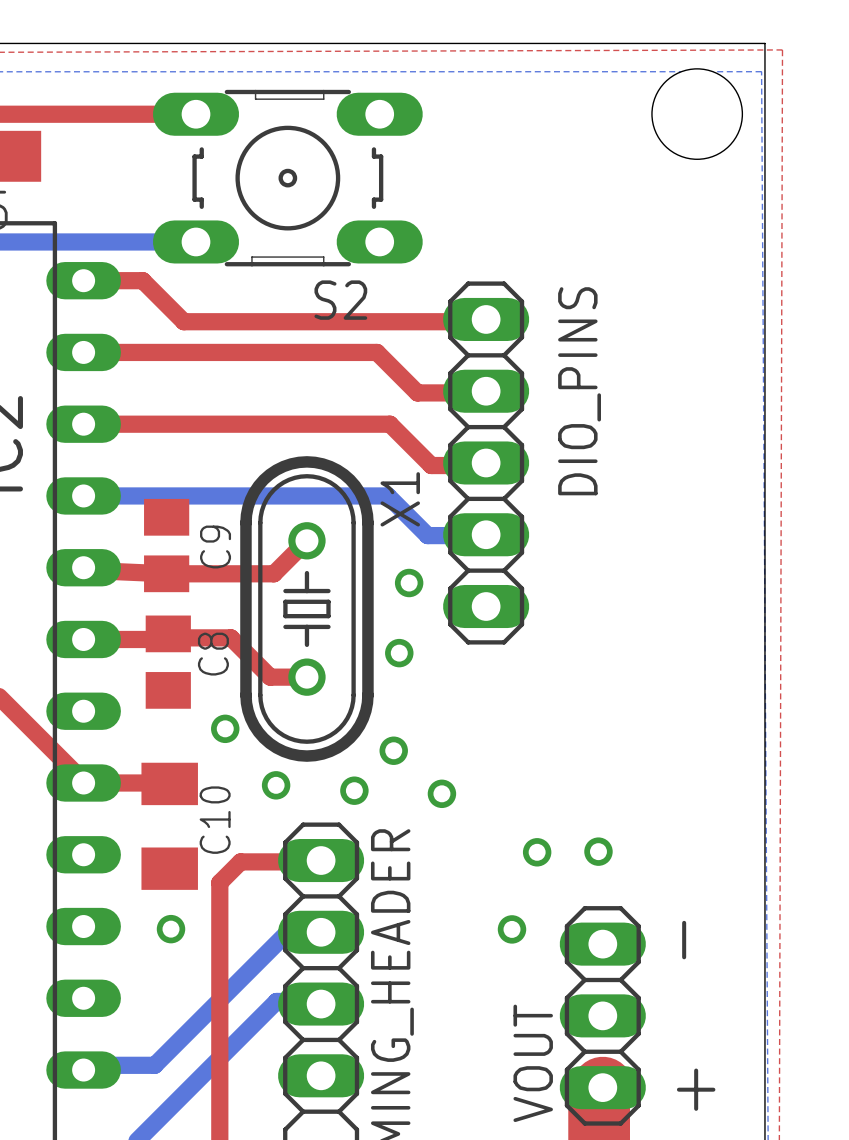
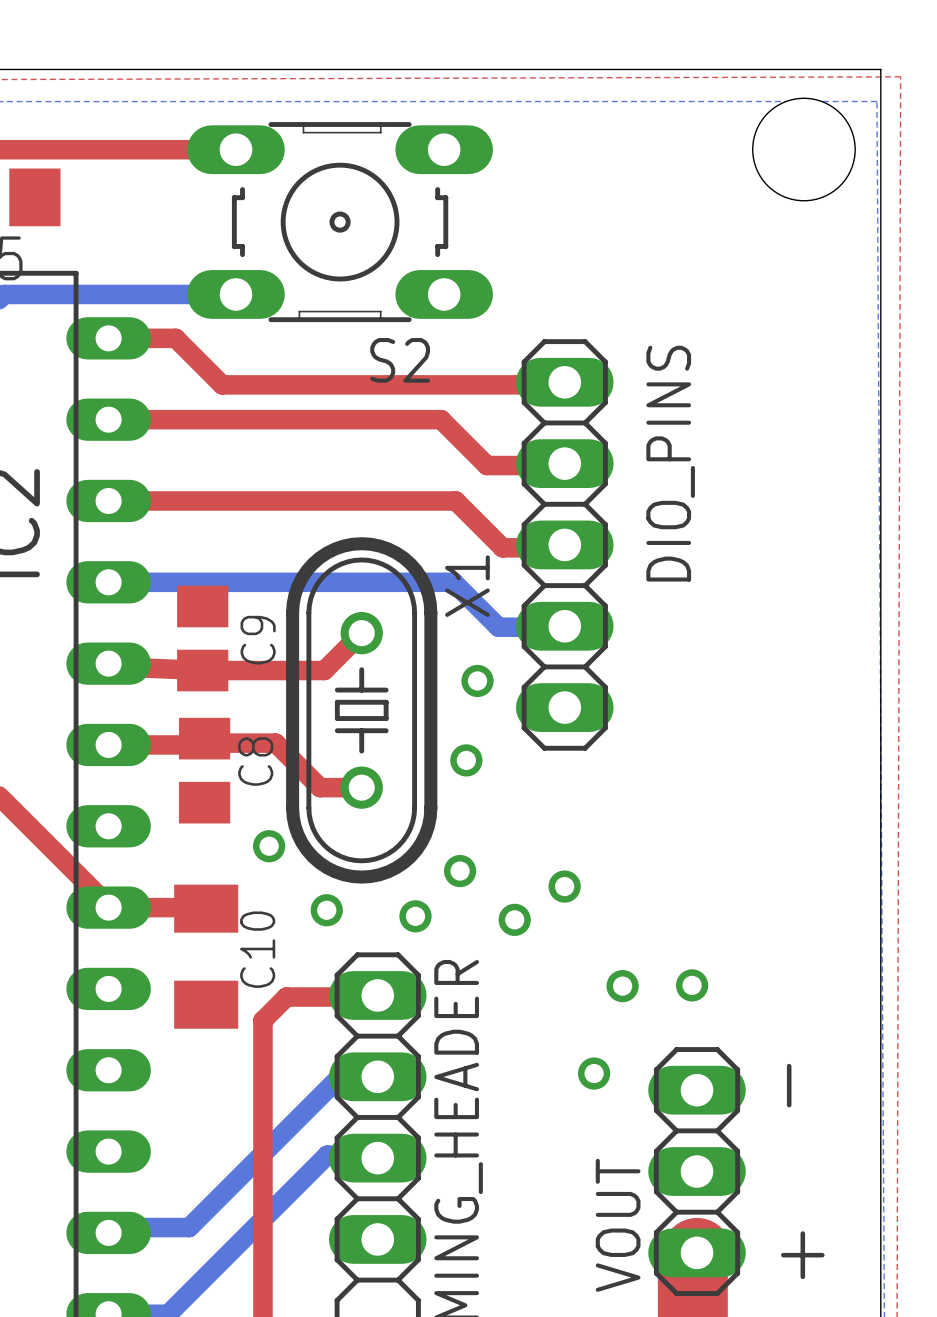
via: none -> (564, 886)
via: (171, 929) -> none

